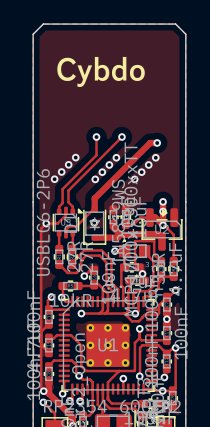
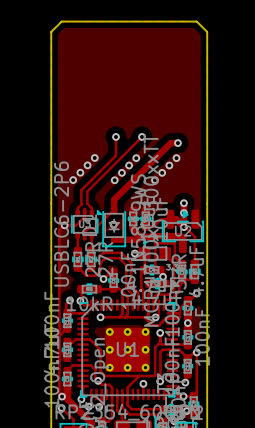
drawing: [57, 56, 145, 87] -> none

